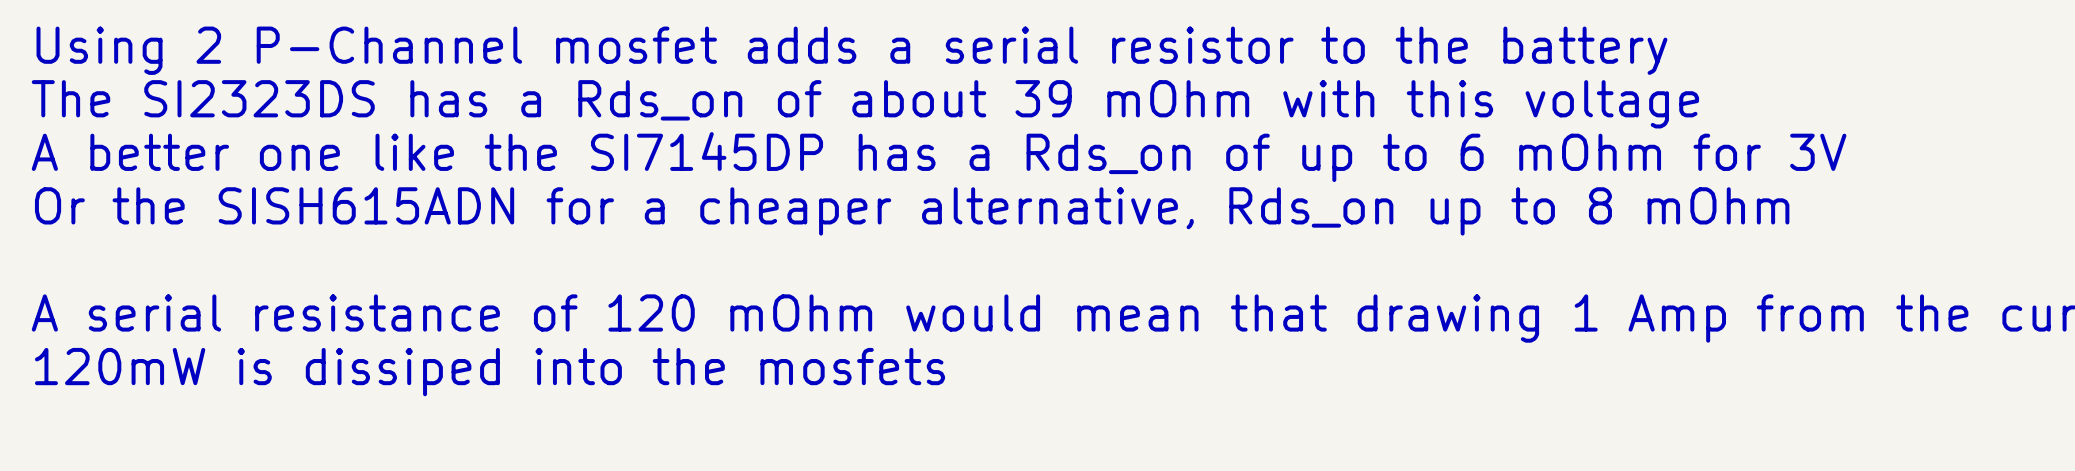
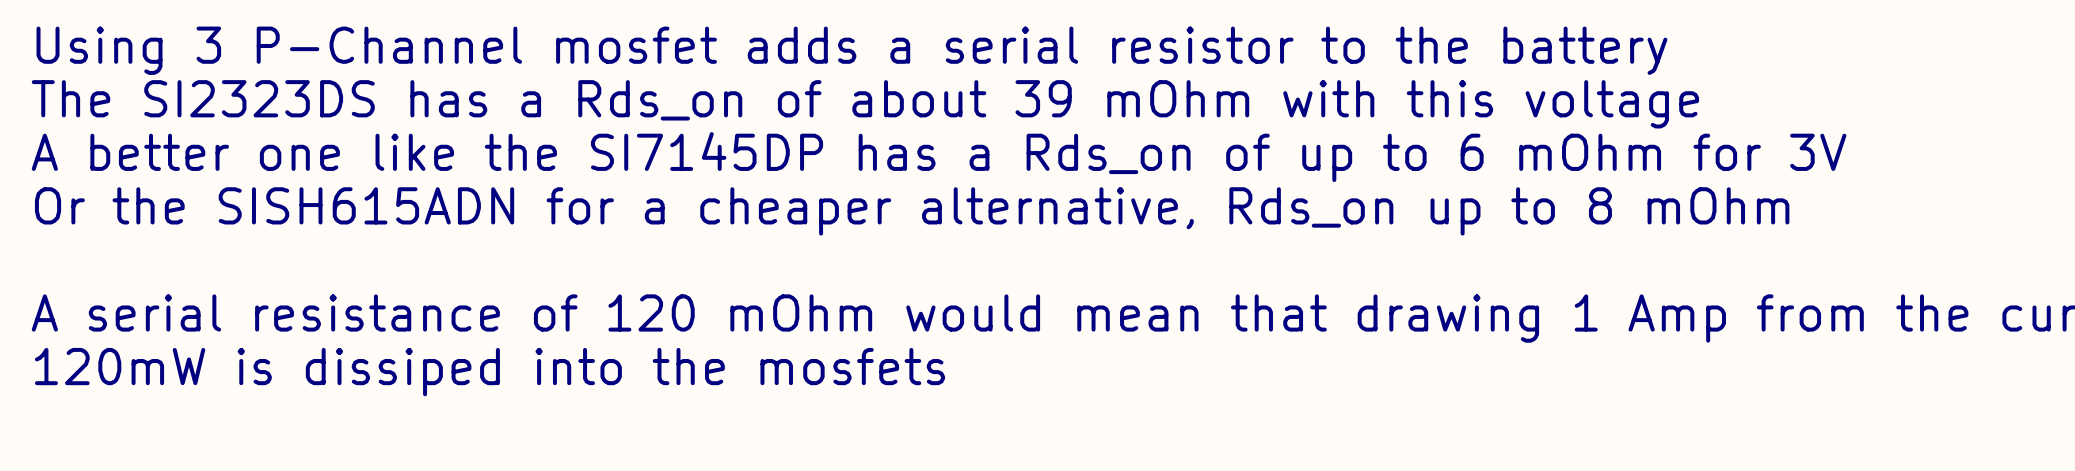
text: Using 2 P-Channel mosfet adds a serial resistor to the battery (851, 50) -> Using 3 P-Channel mosfet adds a serial resistor to the battery (851, 50)

